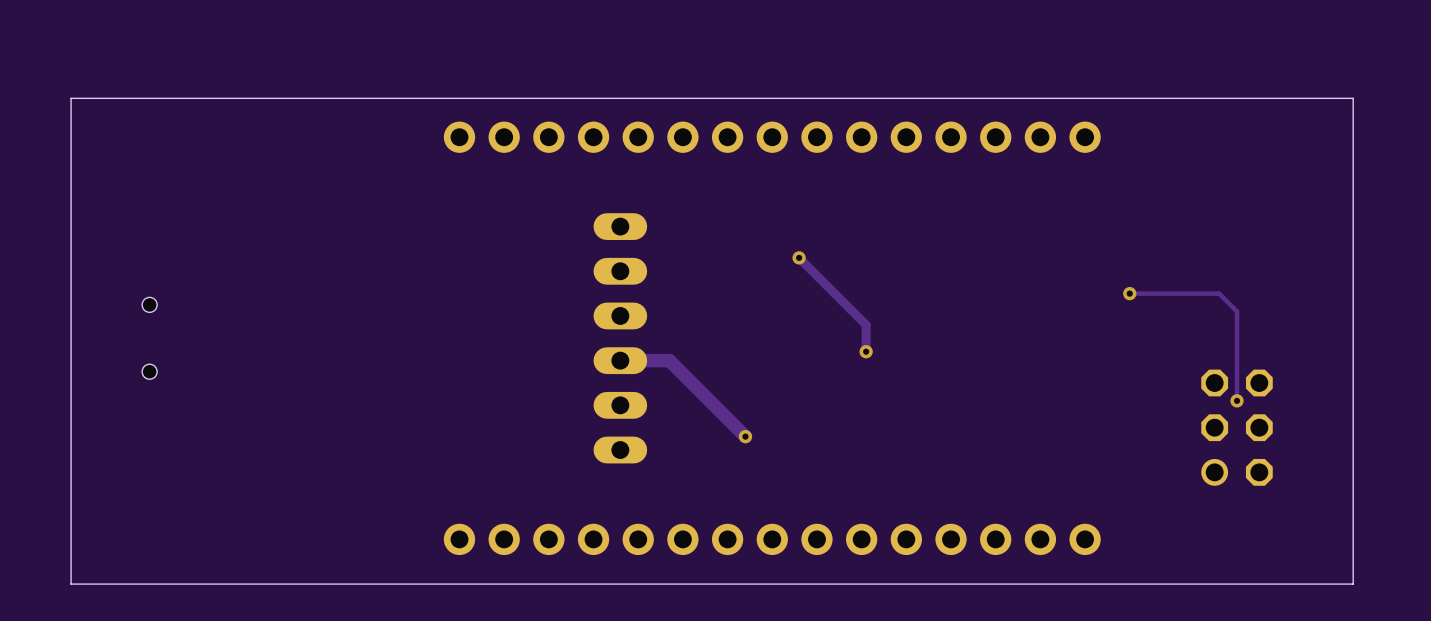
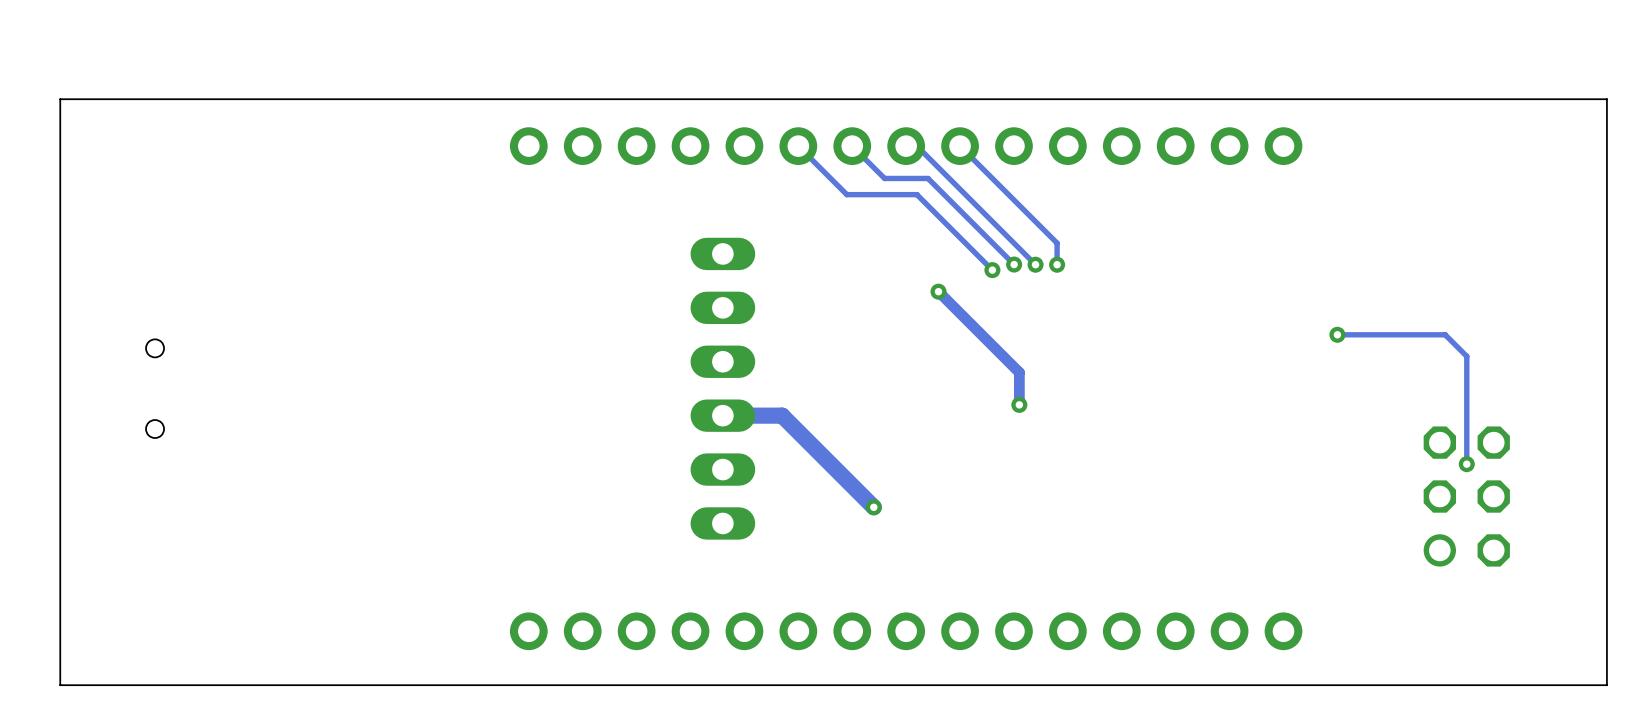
track: none -> (798, 146) (846, 194) (916, 194) (992, 270)
track: none -> (852, 146) (884, 178) (928, 178) (1014, 264)
track: none -> (906, 146) (916, 146) (1035, 264)
track: none -> (960, 146) (1057, 243) (1057, 264)
via: none -> (1014, 264)
via: none -> (1035, 264)
via: none -> (1057, 264)
via: none -> (992, 270)

